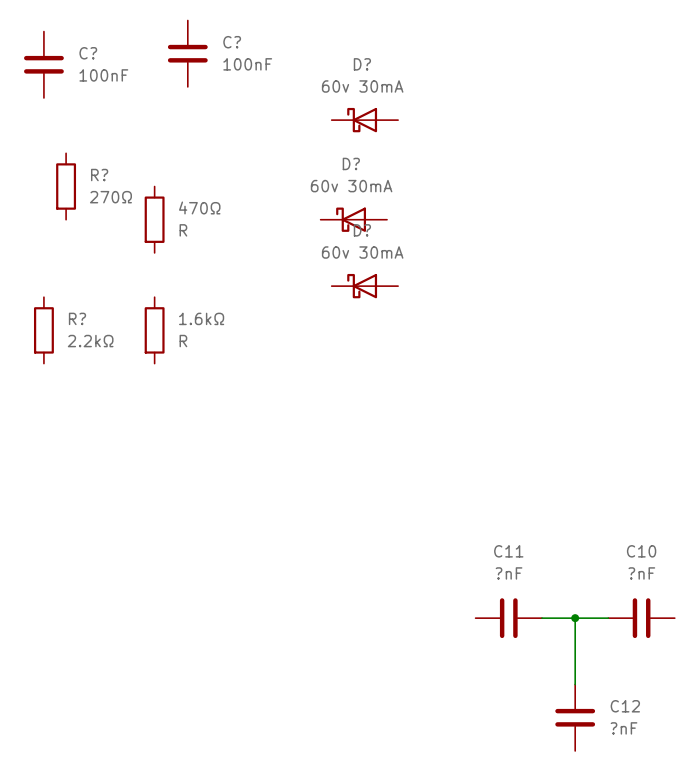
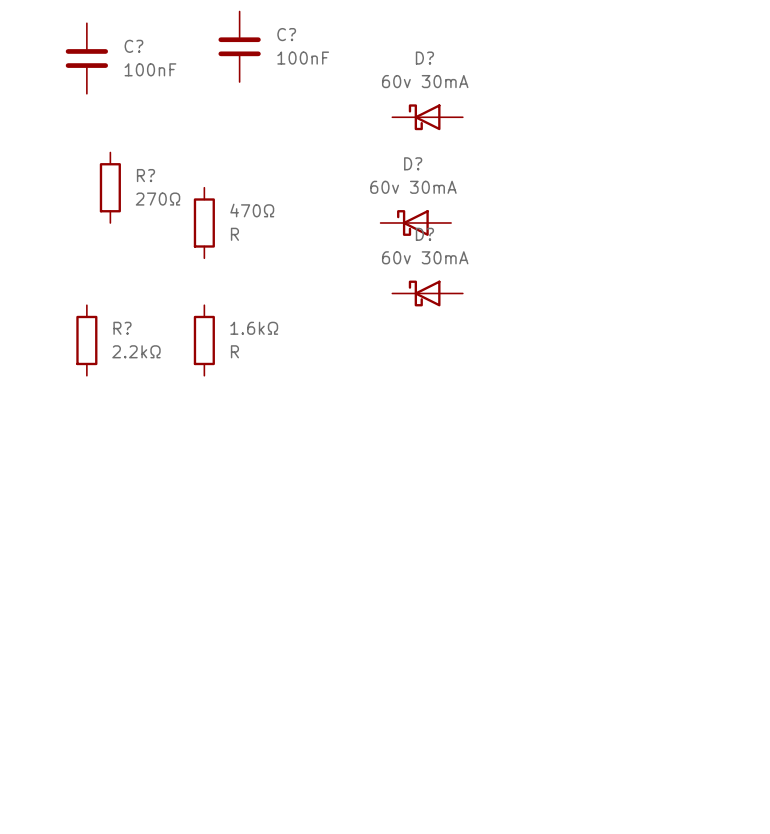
C11: ?nF (508, 618) -> none
wire: (541, 618) (608, 618) -> none
wire: (575, 618) (575, 684) -> none
junction: (575, 618) -> none
C10: ?nF (641, 618) -> none
C12: ?nF (575, 717) -> none

